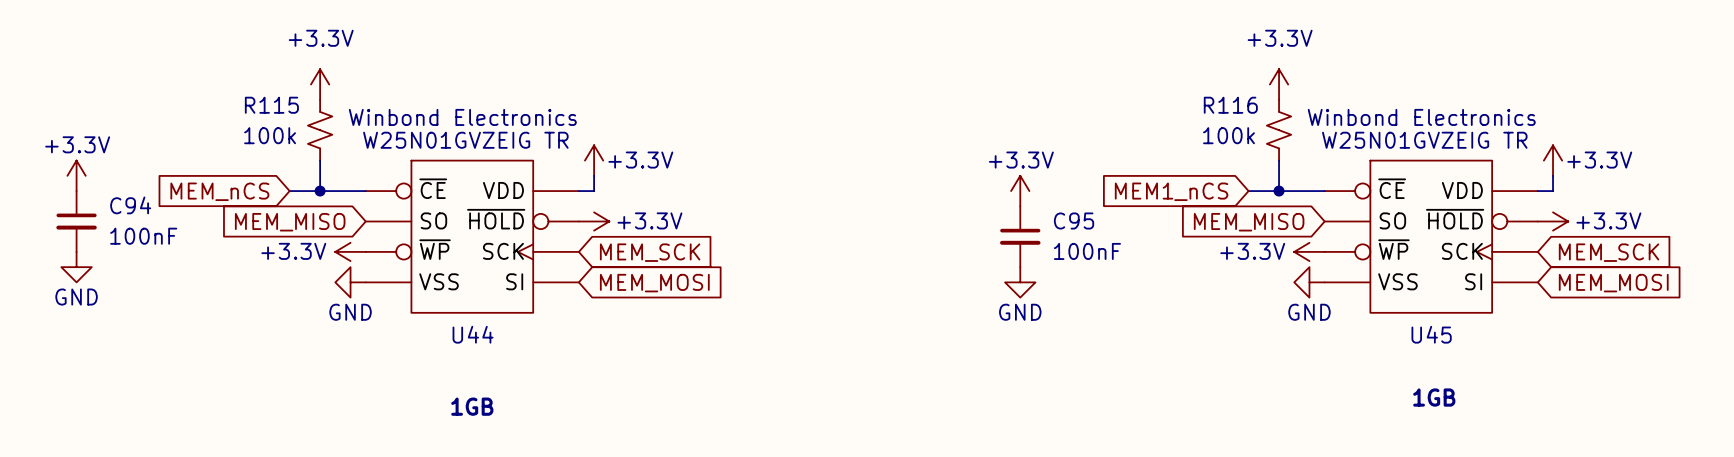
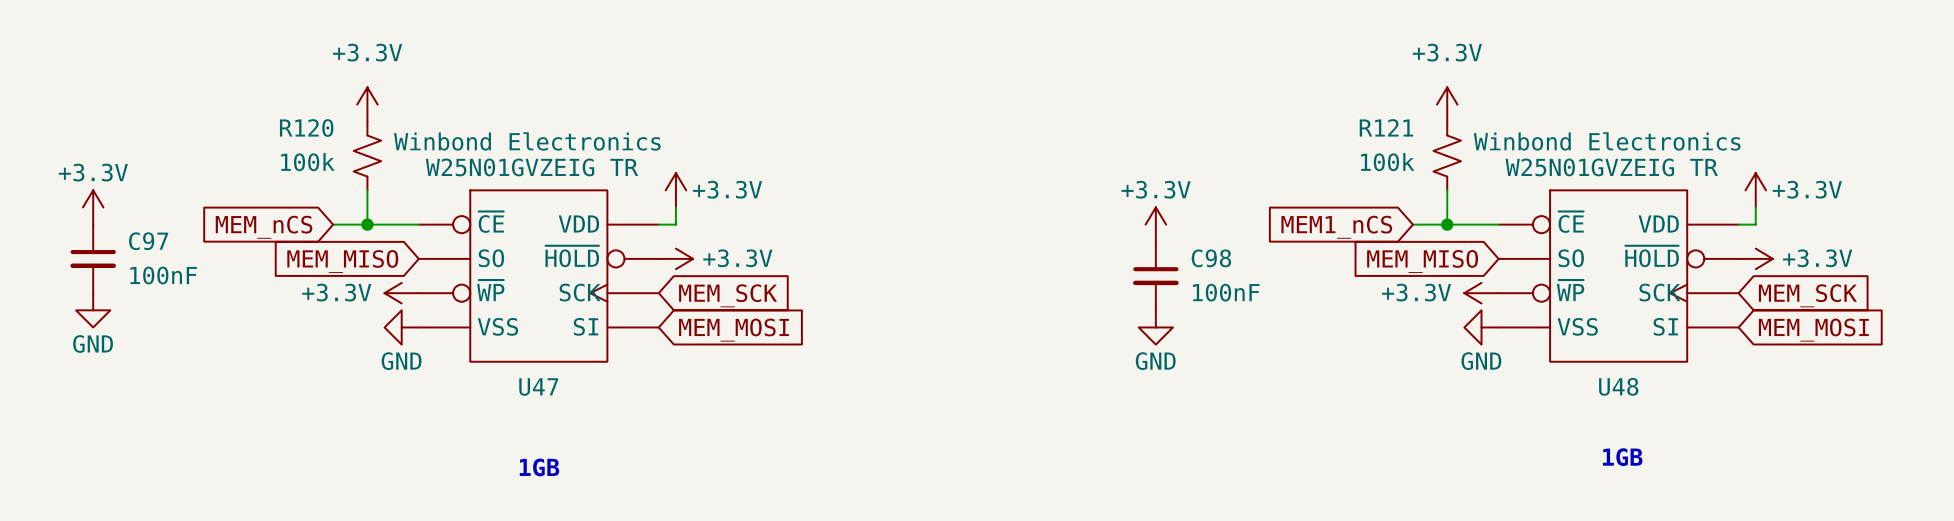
R115 name: R115 (271, 105) -> R120 (306, 128)
R116 name: R116 (1230, 105) -> R121 (1386, 127)
C94 name: C94 (130, 205) -> C97 (148, 241)
C95 name: C95 (1074, 221) -> C98 (1211, 258)
U44 name: U44 (473, 334) -> U47 (538, 386)
U45 name: U45 (1431, 334) -> U48 (1618, 386)

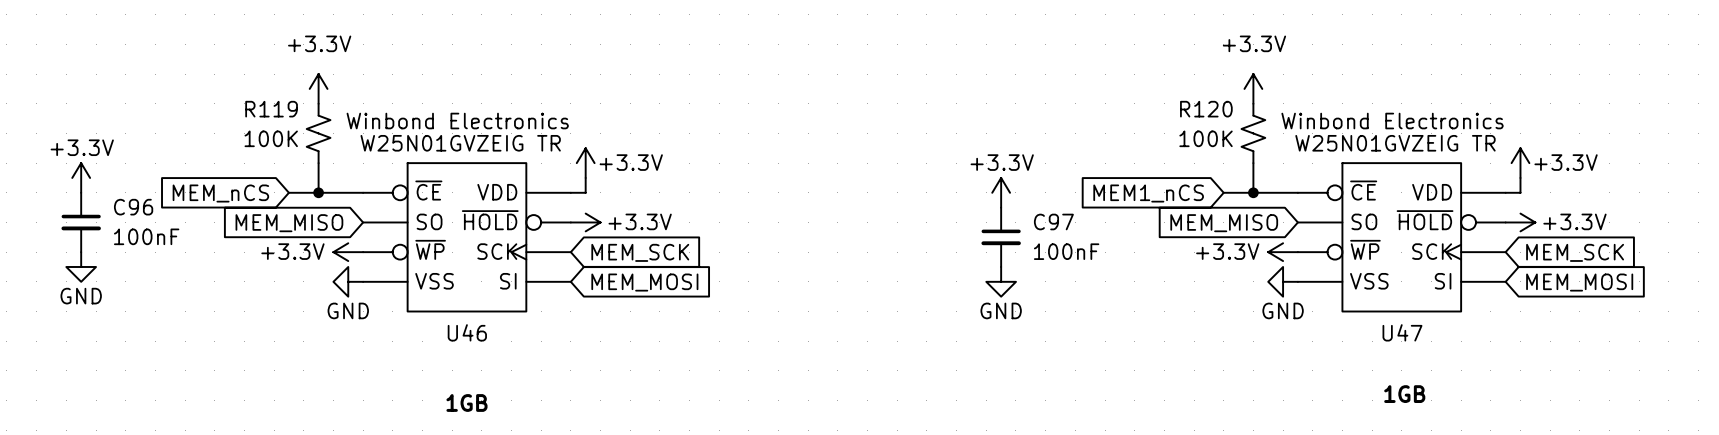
R121 name: R121 (1386, 127) -> R120 (1206, 109)
R120 name: R120 (306, 128) -> R119 (271, 109)
R120 value: 100k (307, 162) -> 100K (271, 138)
R121 value: 100k (1387, 162) -> 100K (1206, 138)
C97 name: C97 (148, 241) -> C96 (133, 207)
C98 name: C98 (1211, 258) -> C97 (1053, 221)
U47 name: U47 (538, 386) -> U46 (467, 332)
U48 name: U48 (1618, 386) -> U47 (1402, 332)

